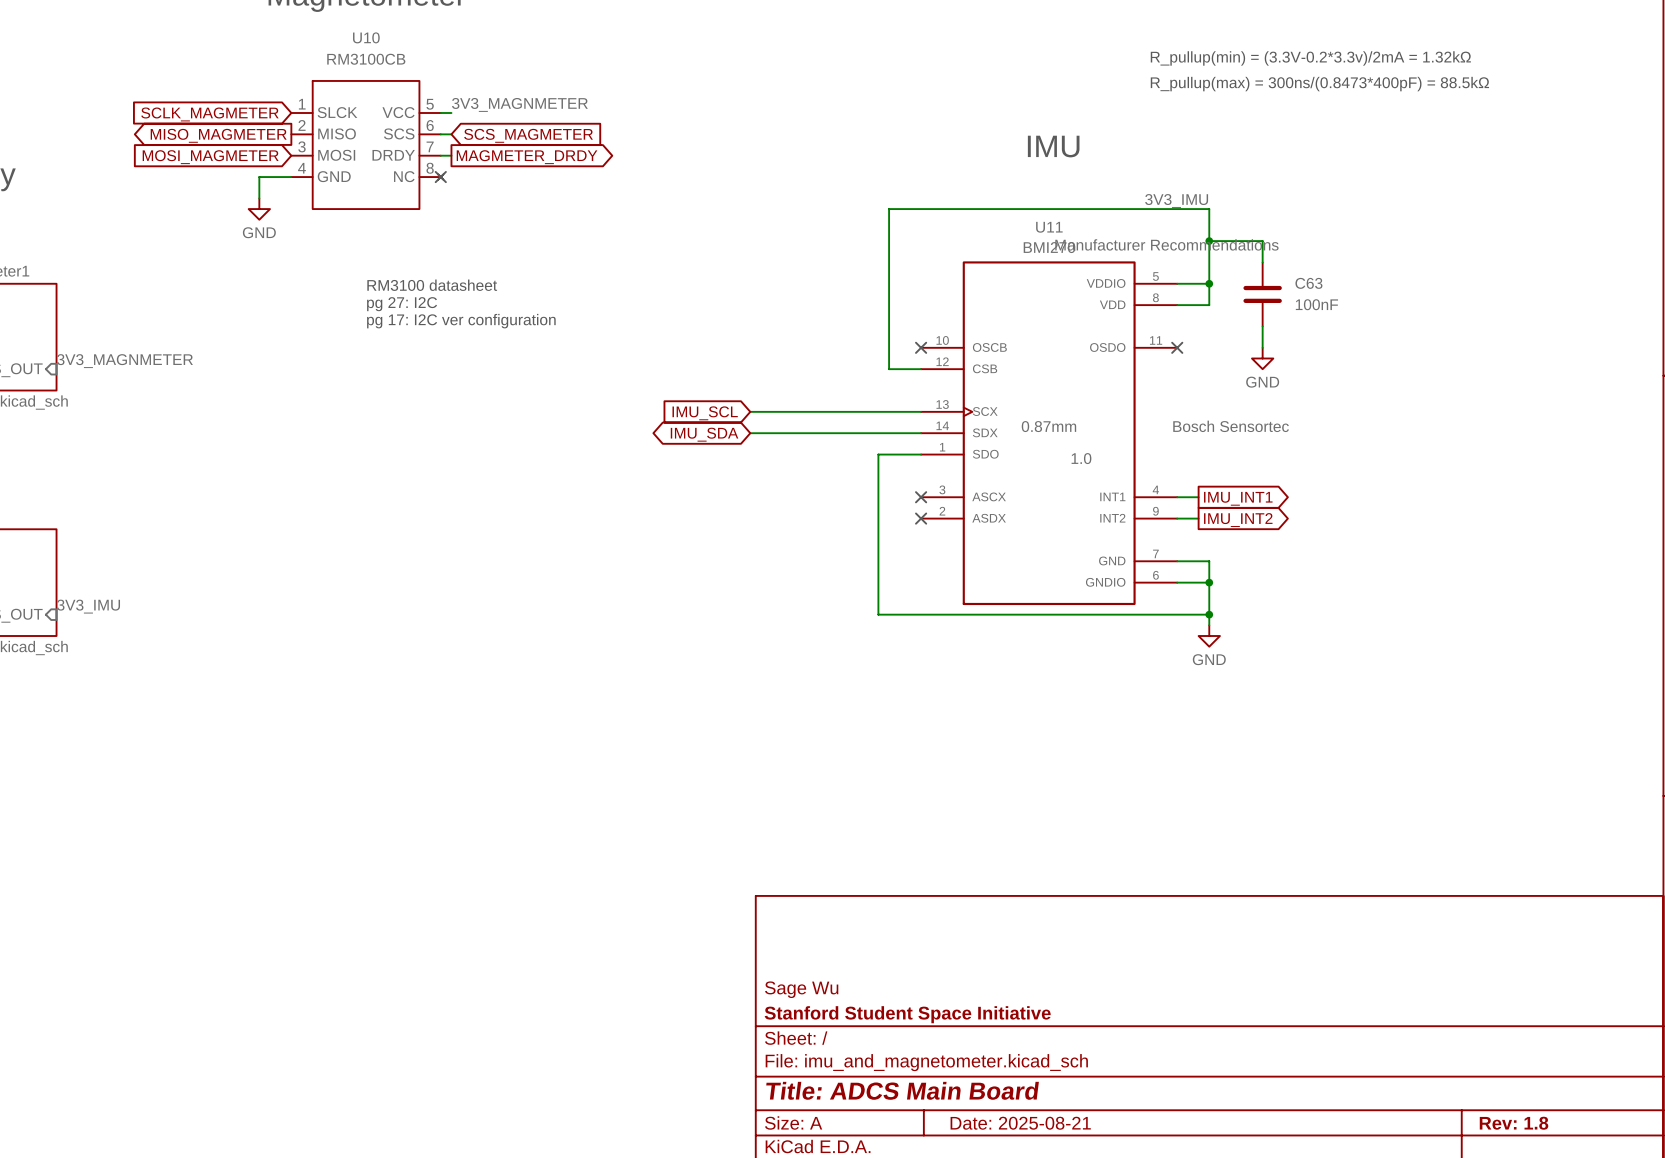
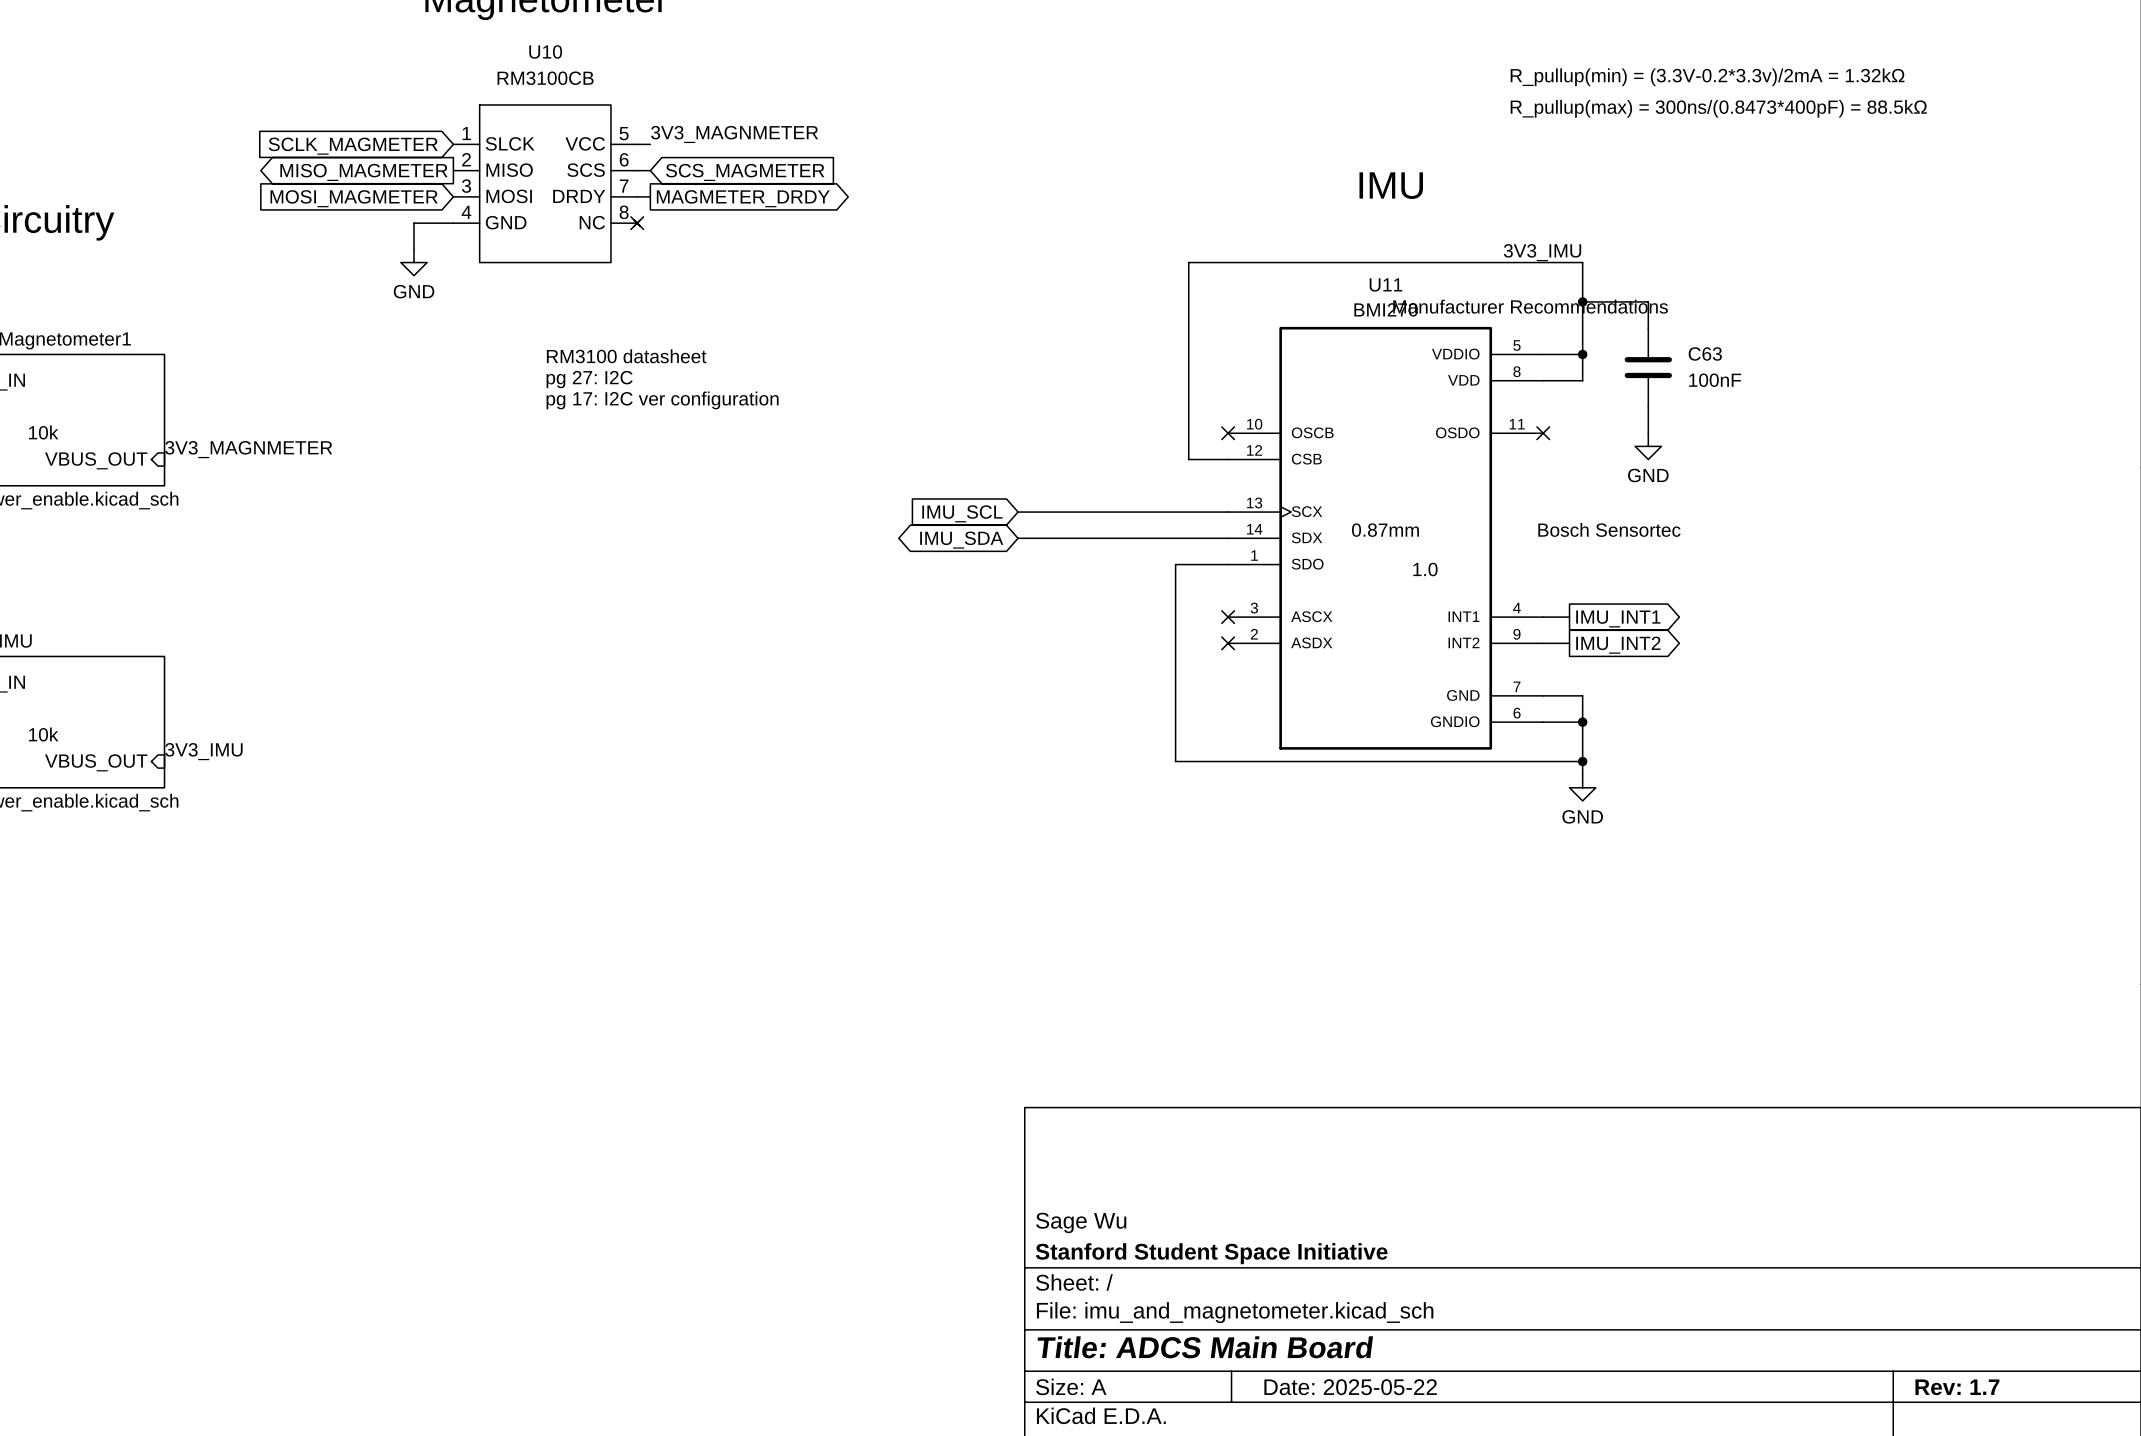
title block: Date: 2025-08-21 (1020, 1123) -> Date: 2025-05-22 (1350, 1387)
title block: Rev: 1.8 (1514, 1123) -> Rev: 1.7 (1957, 1387)

